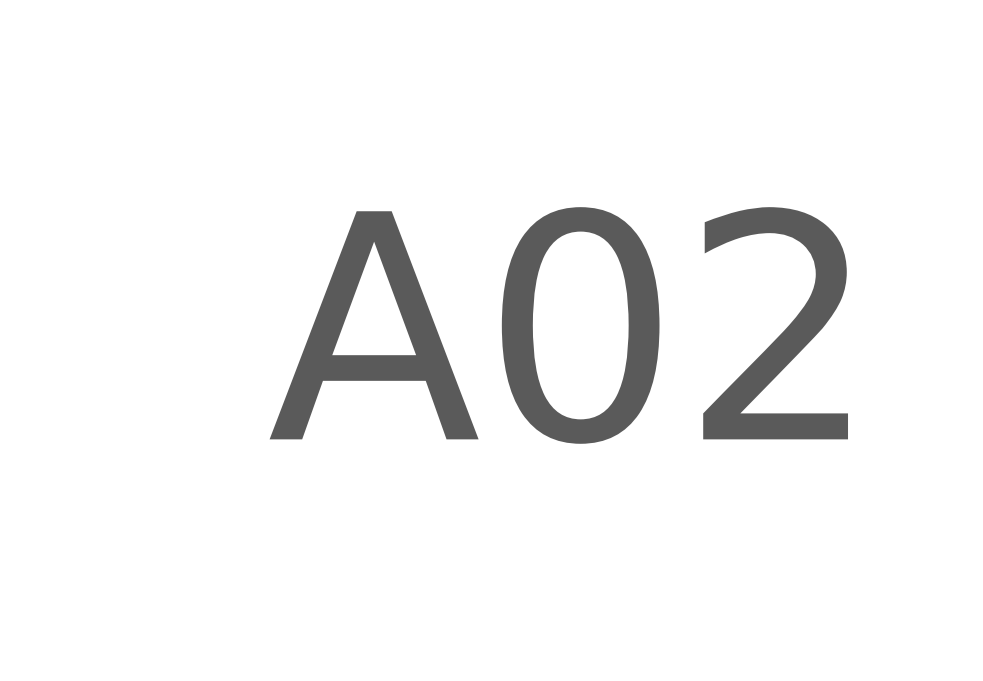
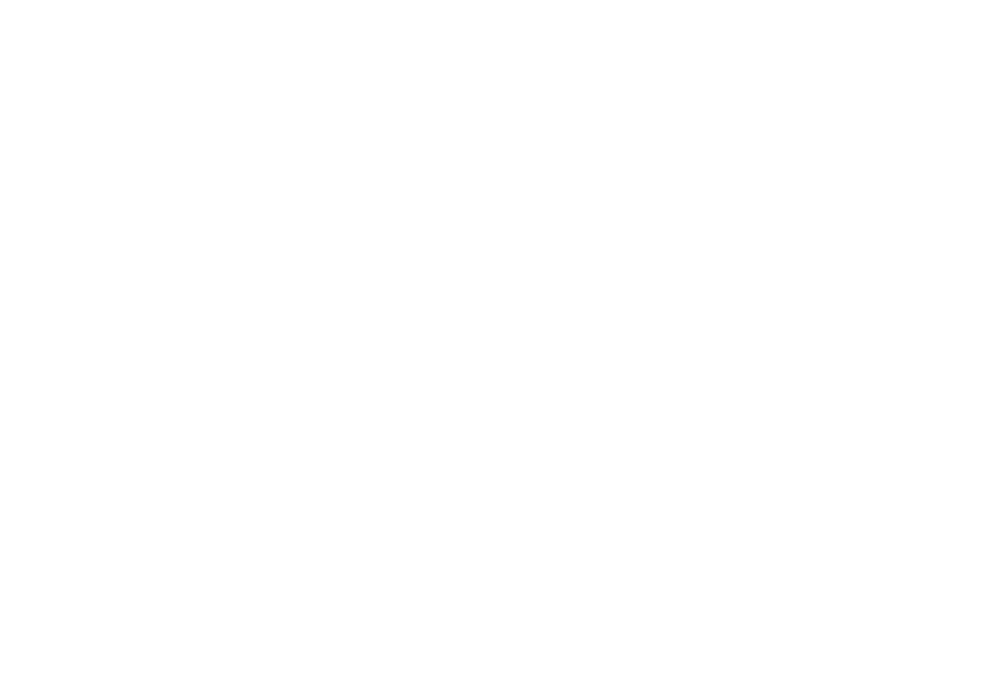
text: A02 (558, 325) -> none

